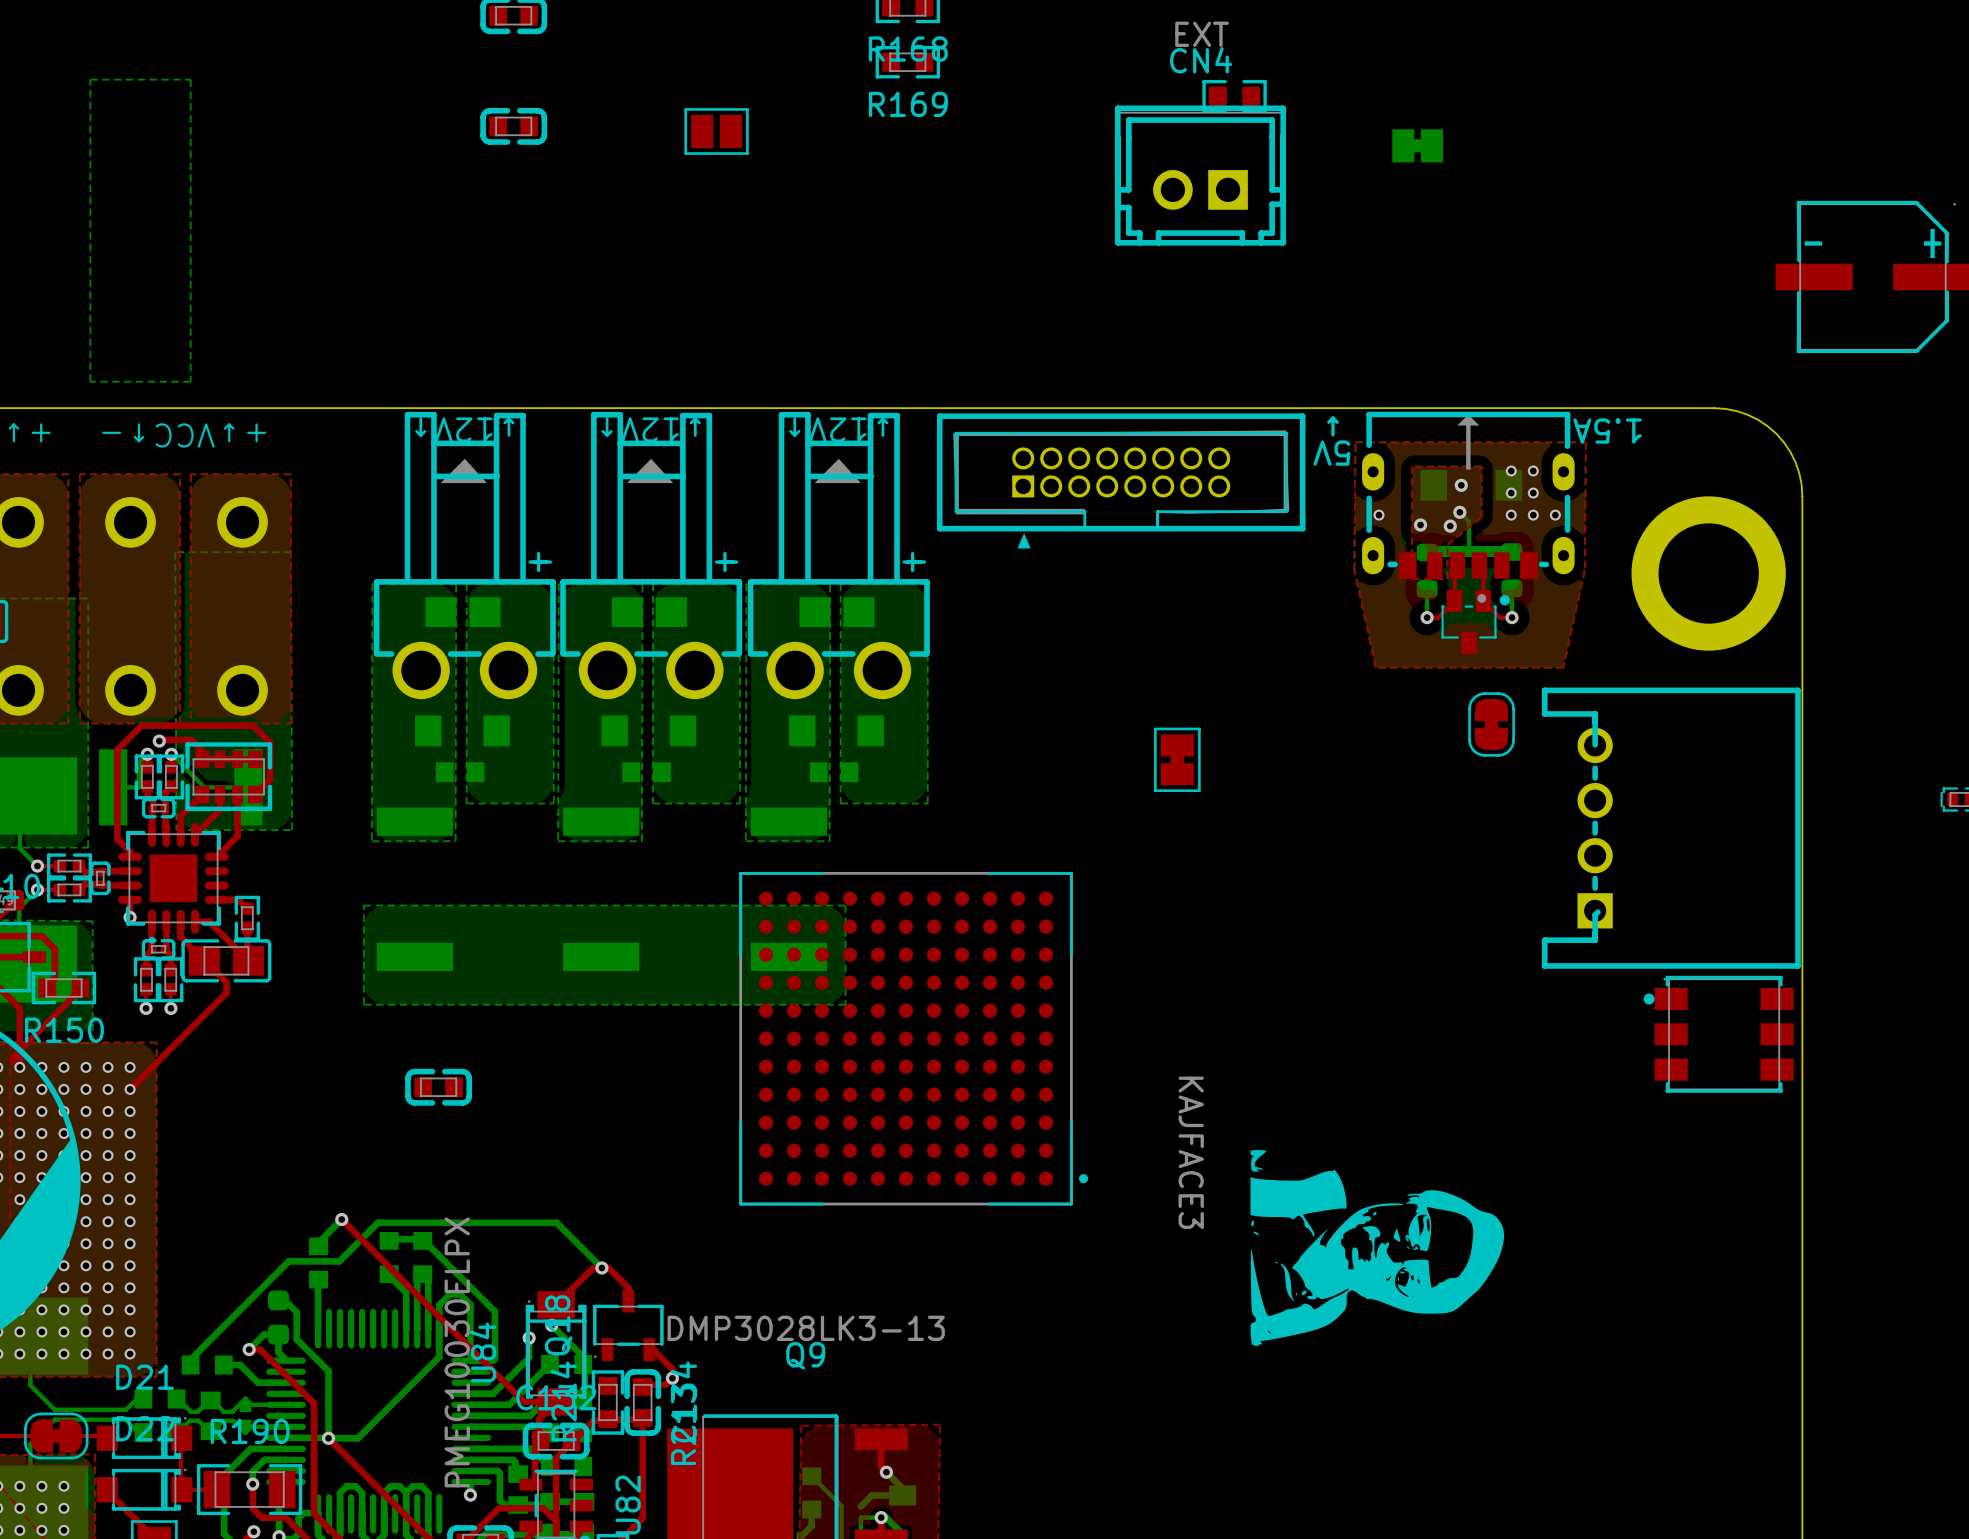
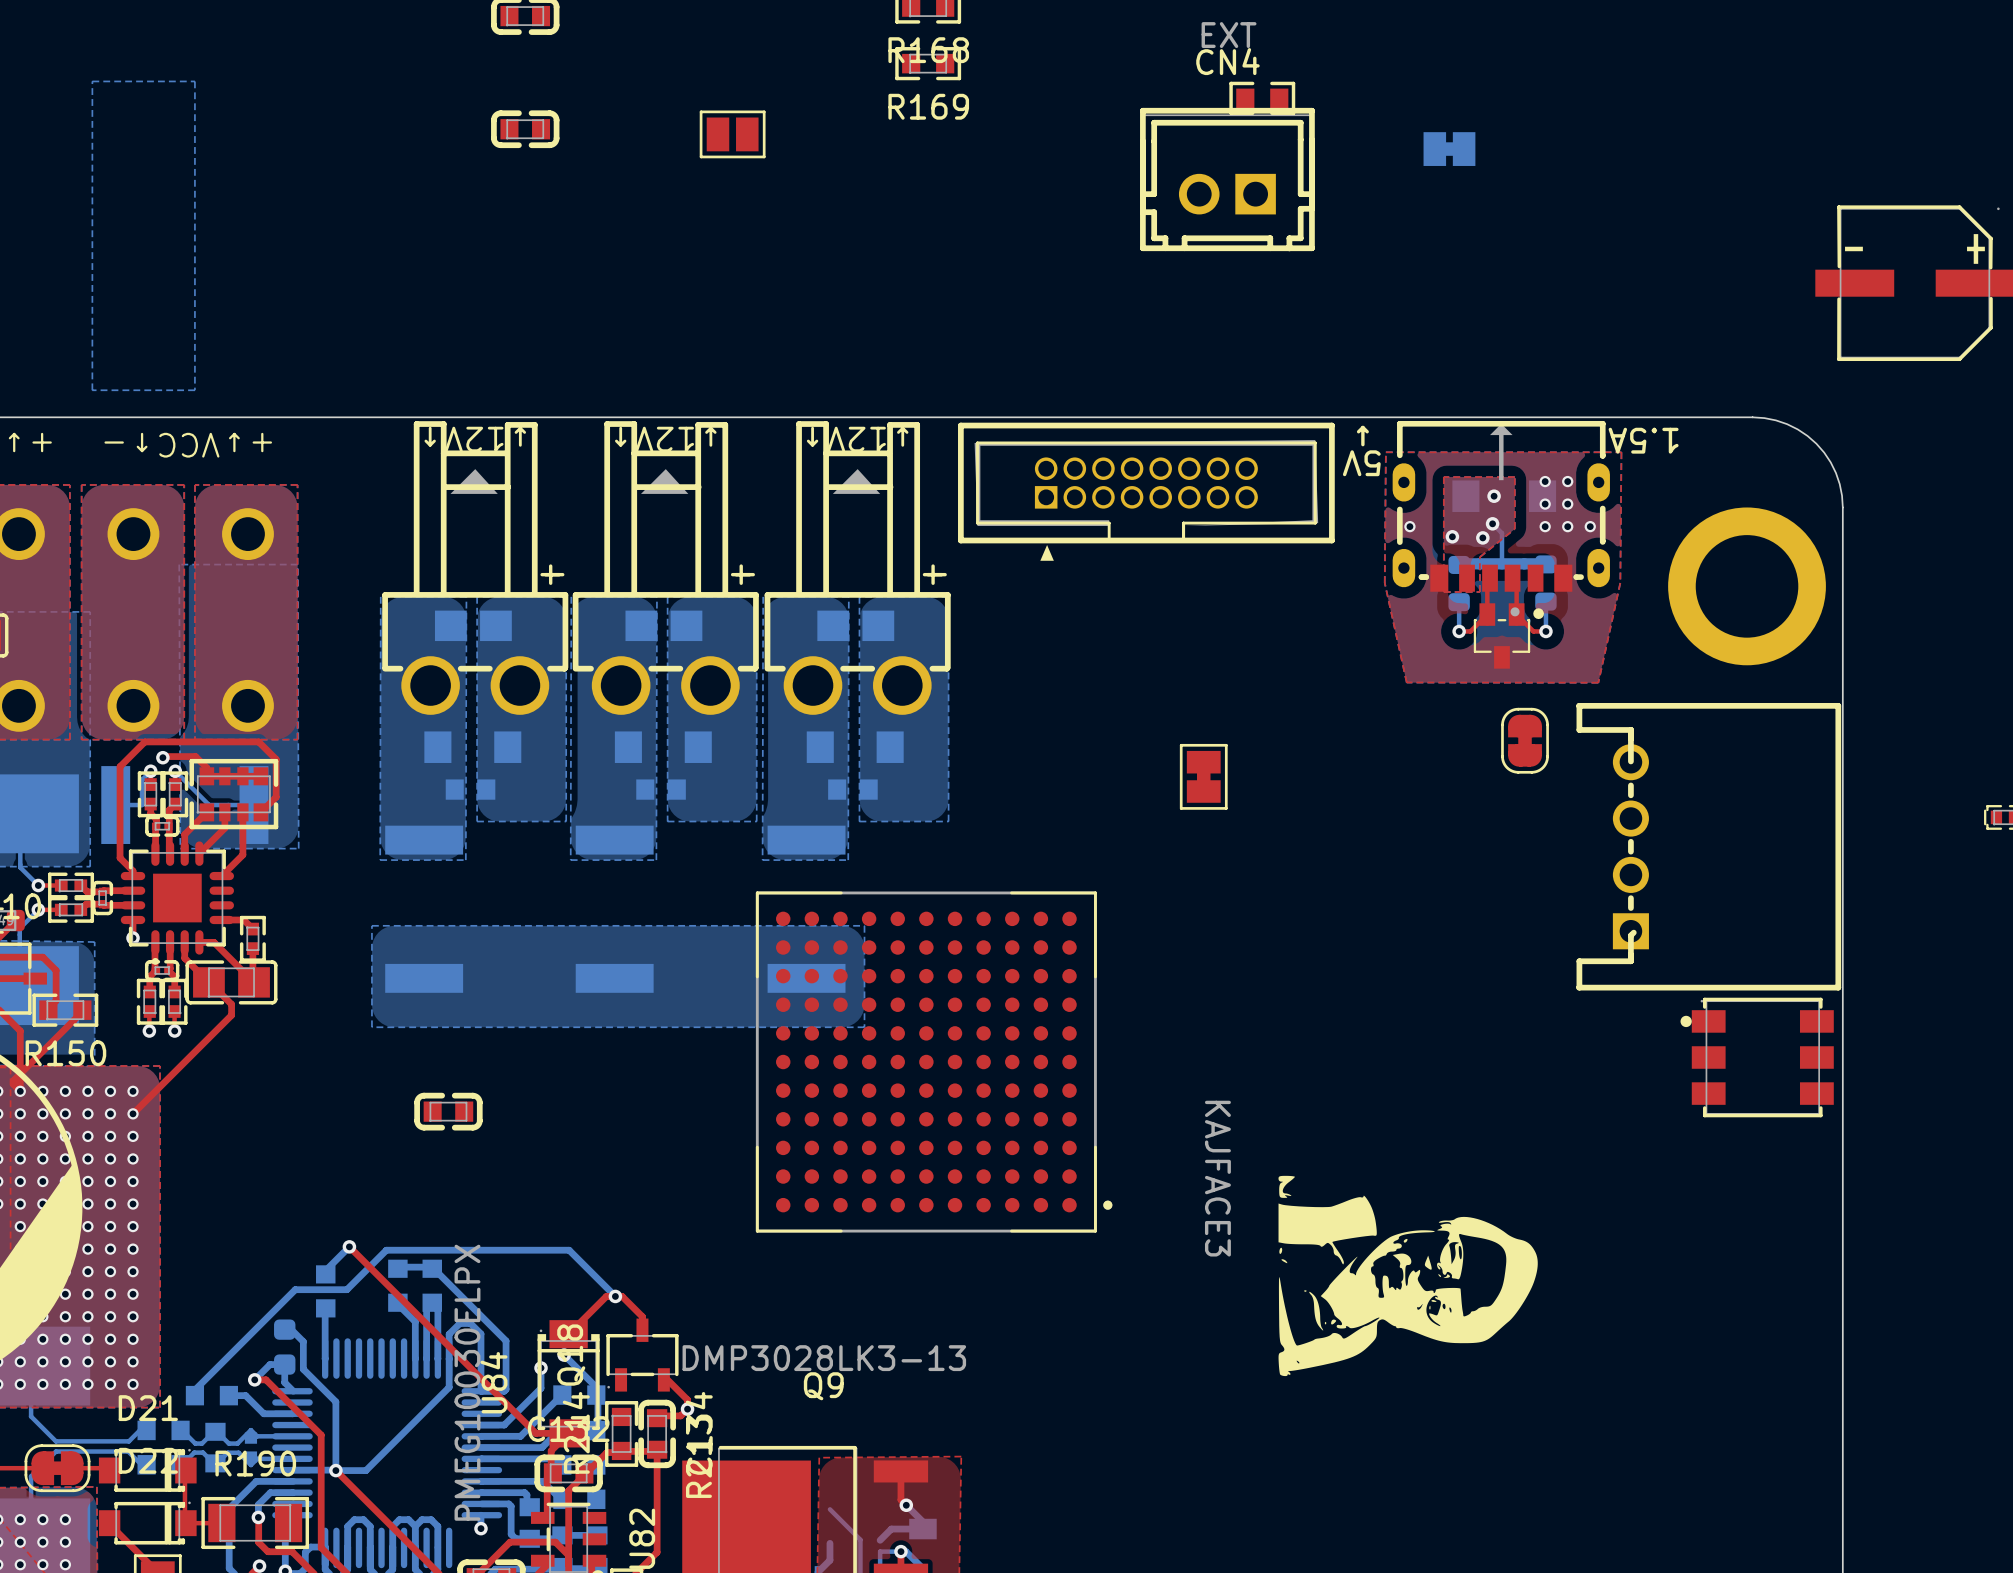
part: (811, 1492) -> none

